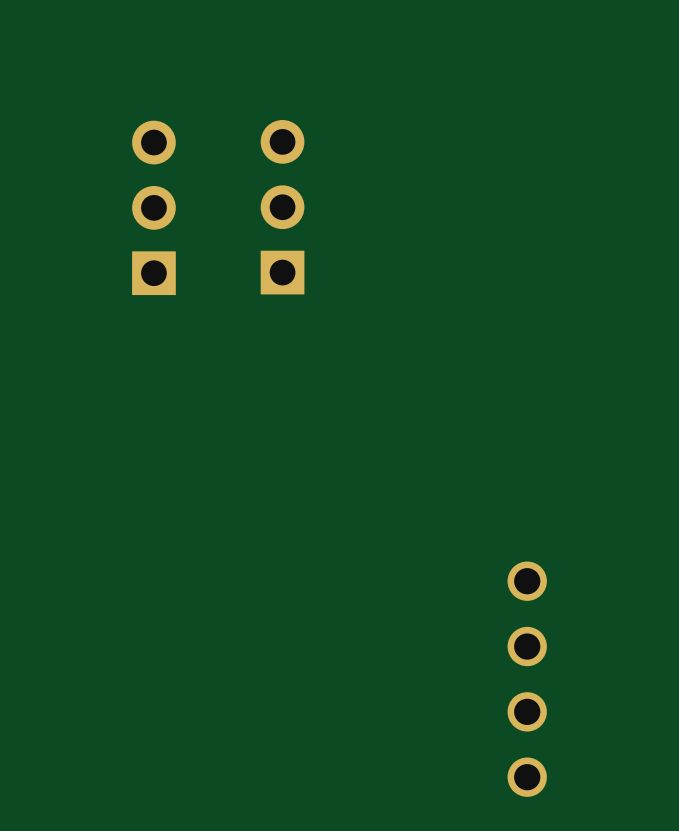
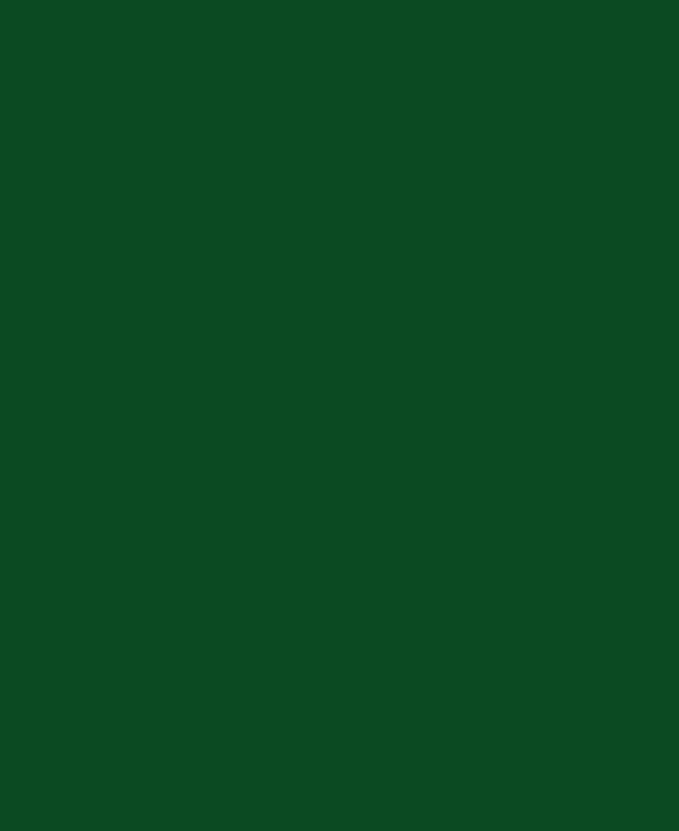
part: (153, 207) -> none
part: (282, 207) -> none
part: (527, 679) -> none

